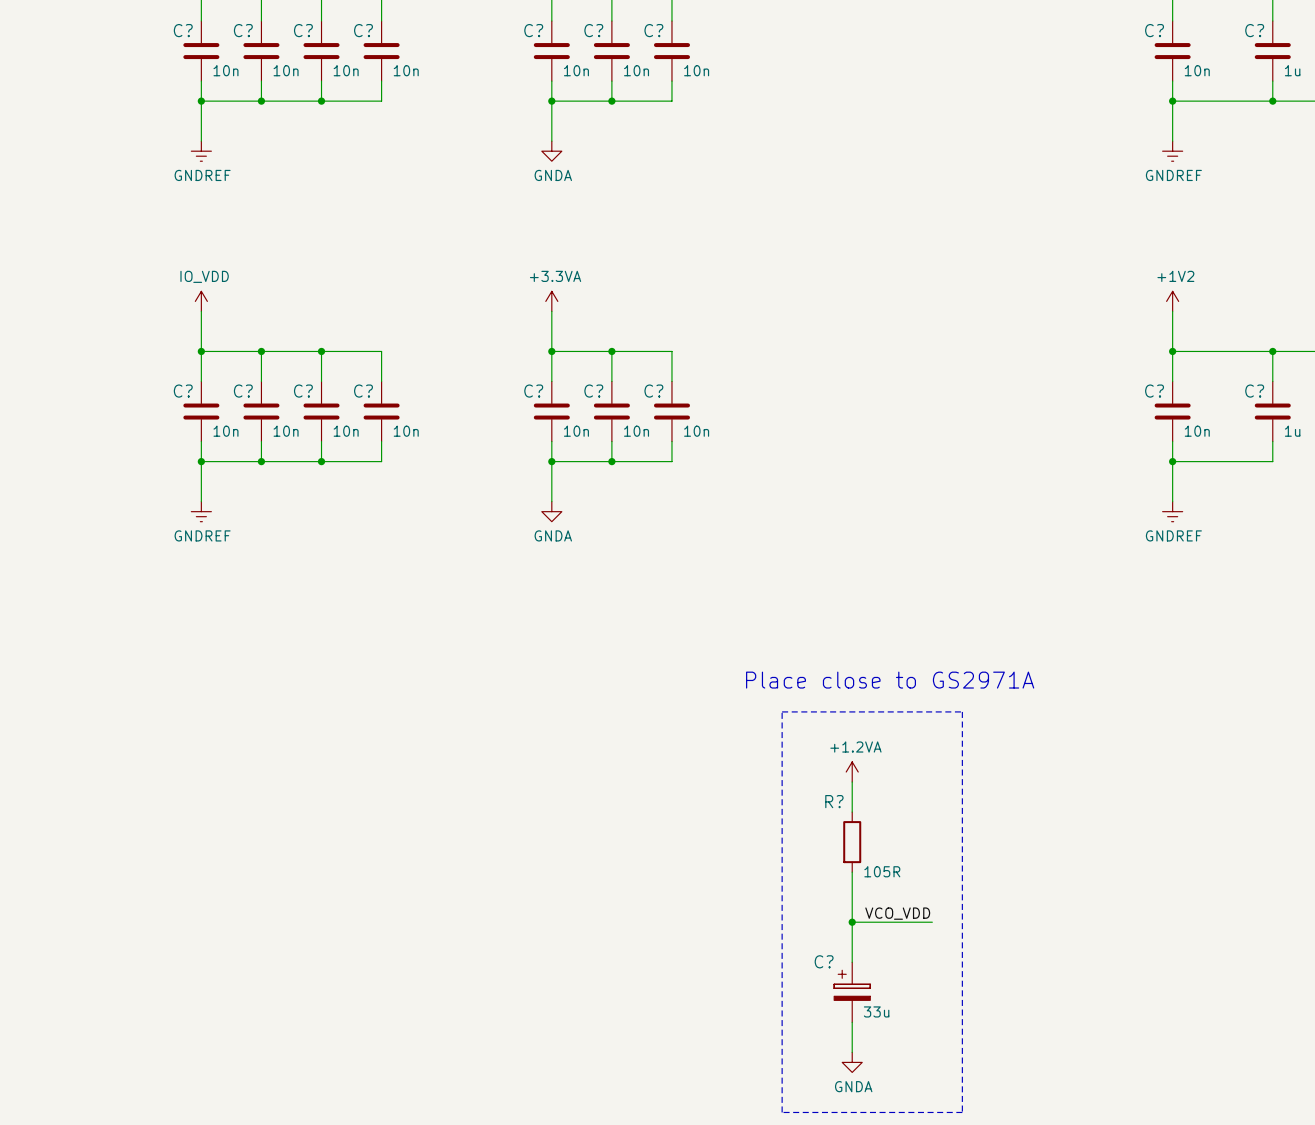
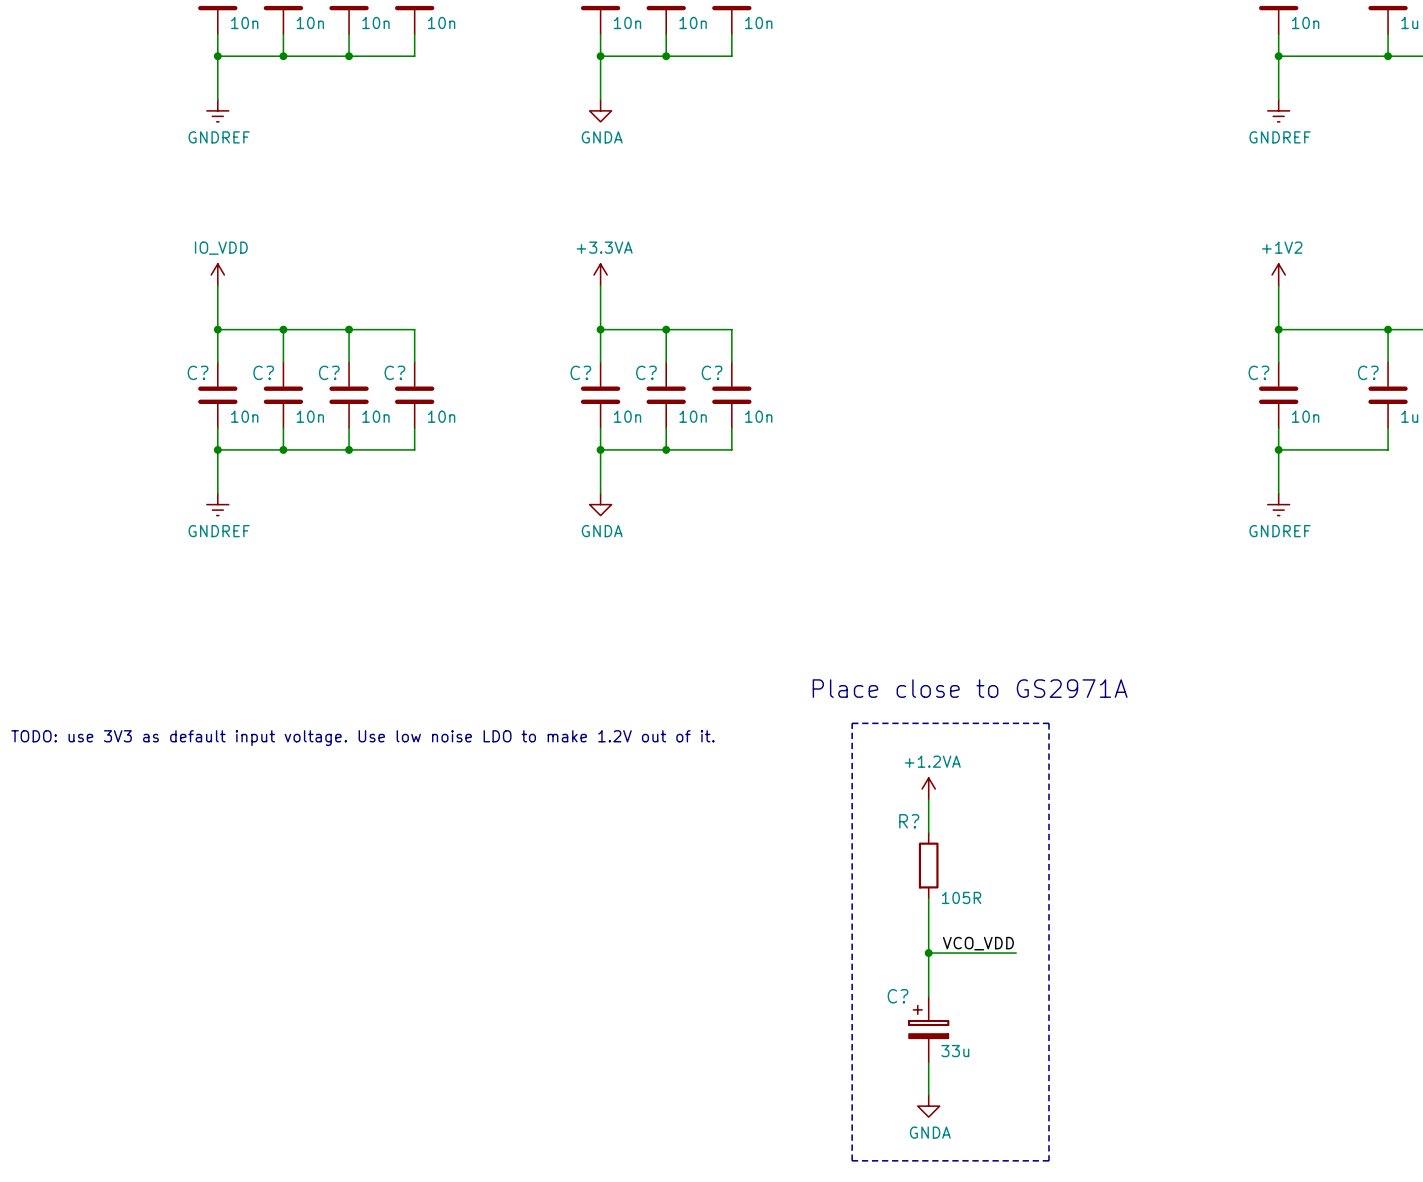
text: none -> TODO: use 3V3 as default input voltage. Use low noise LDO to make 1.2V out of it. (362, 738)

